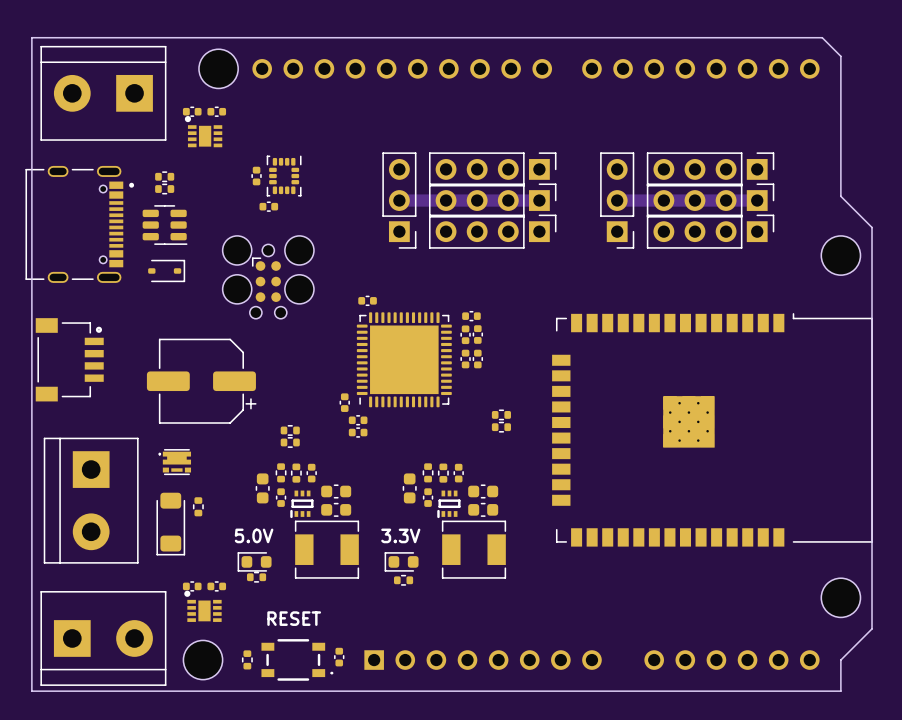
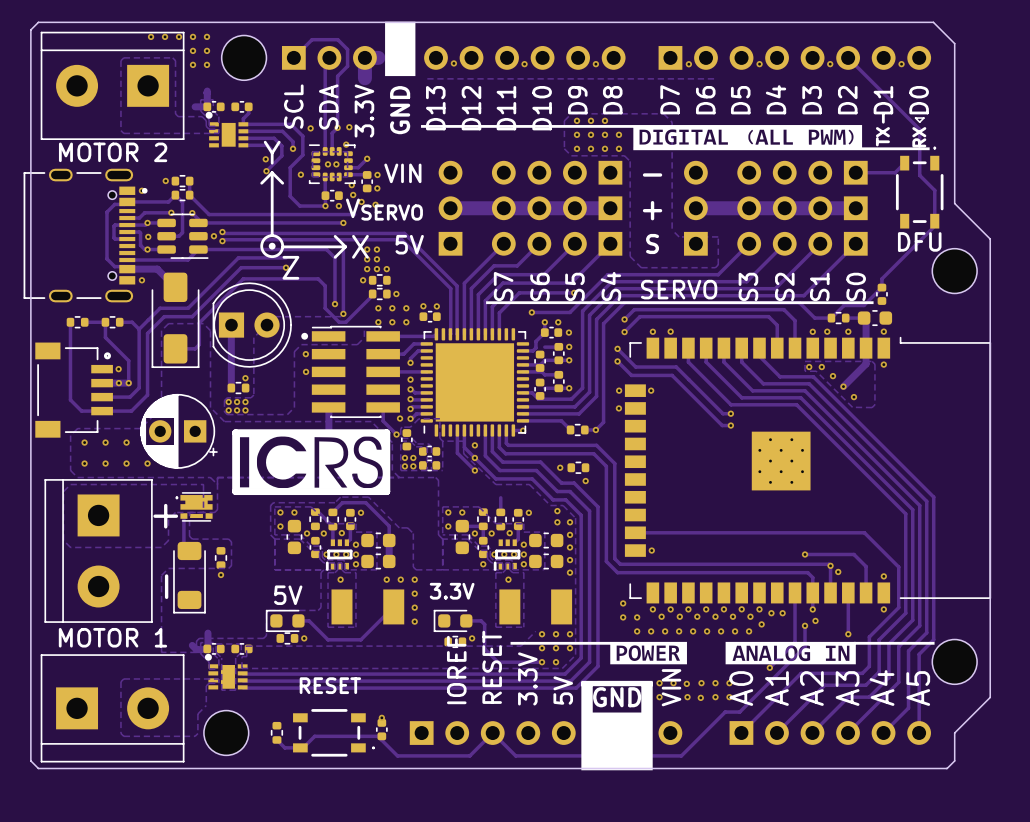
part footprint: [31, 37, 873, 692] -> [30, 21, 991, 770]
drawing: none -> [385, 21, 416, 77]
via: none -> (151, 36)
via: none -> (165, 36)
via: none -> (179, 36)
via: none -> (193, 36)
via: none -> (207, 36)
via: none -> (193, 50)
via: none -> (207, 50)
zone outline: none -> (123, 57) (120, 60) (120, 130) (123, 133) (218, 133) (218, 129) (209, 129) (206, 126) (206, 120) (202, 116) (178, 116) (175, 113) (175, 60) (172, 57) (123, 57)
track: none -> (293, 57) (312, 39) (337, 39) (347, 49) (347, 66) (337, 76) (337, 127) (332, 133) (332, 151)
track: none -> (329, 57) (325, 62) (325, 151)
track: none -> (378, 57) (364, 57) (364, 78)
part: none -> (453, 57)
part: none -> (794, 57)
track: none -> (848, 57) (919, 129) (919, 175) (934, 190) (934, 226) (881, 278) (881, 287)
via: none -> (453, 63)
via: none -> (193, 64)
via: none -> (207, 64)
via: none -> (524, 64)
via: none -> (595, 64)
via: none -> (688, 64)
via: none -> (759, 64)
via: none -> (830, 64)
via: none -> (901, 64)
zone outline: none -> (427, 78) (714, 78)
track: none -> (207, 91) (207, 106) (195, 106)
zone outline: none -> (200, 99) (200, 111) (209, 119) (209, 126) (218, 126) (218, 116) (213, 111) (213, 99) (200, 99)
text: none -> D9 (577, 100)
text: none -> D8 (612, 100)
text: none -> D7 (670, 99)
text: none -> D6 (705, 100)
text: none -> D5 (740, 100)
text: none -> D4 (776, 99)
text: none -> D3 (812, 100)
text: none -> D2 (847, 100)
text: none -> D1 (883, 100)
text: none -> D0 (919, 100)
track: none -> (248, 106) (248, 113) (243, 118) (243, 124) (290, 124) (302, 136) (302, 155) (290, 167) (290, 196) (299, 206) (325, 206) (325, 176)
text: none -> SCL (293, 106)
text: none -> SDA (328, 106)
text: none -> D13 (435, 108)
text: none -> D12 (471, 108)
text: none -> D11 (506, 108)
text: none -> D10 (542, 108)
text: none -> GND (400, 110)
text: none -> 3.3V (364, 110)
zone outline: none -> (571, 113) (663, 113) (672, 122) (672, 229) (679, 236) (718, 236) (718, 264) (715, 267) (641, 267) (630, 256) (630, 161) (624, 155) (571, 155) (564, 148) (564, 120) (571, 113)
line: none -> (883, 113) (883, 122)
line: none -> (915, 118) (923, 118) (919, 122) (915, 118)
via: none -> (577, 120)
via: none -> (590, 120)
via: none -> (604, 120)
drawing: none -> [421, 125, 930, 151]
via: none -> (349, 127)
via: none -> (310, 128)
via: none -> (337, 127)
track: none -> (243, 131) (282, 131) (293, 141) (293, 148)
via: none -> (577, 134)
via: none -> (590, 134)
via: none -> (604, 134)
via: none -> (618, 134)
text: none -> TX (882, 136)
text: none -> RX (919, 137)
track: none -> (243, 138) (274, 138) (281, 146) (281, 155) (266, 171)
via: none -> (346, 144)
track: none -> (243, 145) (267, 145) (272, 150)
via: none -> (293, 148)
via: none -> (577, 148)
via: none -> (590, 148)
via: none -> (604, 148)
via: none -> (618, 148)
text: none -> MOTOR 2 (113, 152)
text: none -> Y (272, 152)
zone outline: none -> (312, 151) (312, 176) (347, 176) (347, 151) (312, 151)
part footprint: [382, 152, 417, 249] -> [438, 160, 463, 256]
part footprint: [429, 152, 557, 187] -> [491, 160, 623, 185]
part footprint: [600, 152, 635, 249] -> [684, 160, 708, 256]
part footprint: [646, 152, 775, 187] -> [737, 160, 868, 185]
via: none -> (265, 159)
track: none -> (367, 158) (358, 167) (348, 167)
via: none -> (367, 158)
track: none -> (904, 163) (895, 172) (855, 172)
via: none -> (328, 164)
via: none -> (336, 164)
via: none -> (266, 171)
line: none -> (272, 172) (282, 183)
line: none -> (272, 172) (261, 183)
line: none -> (272, 172) (272, 235)
text: none -> VIN (402, 173)
via: none -> (300, 174)
track: none -> (348, 174) (367, 174)
via: none -> (377, 174)
text: none -> - (652, 175)
via: none -> (165, 180)
track: none -> (189, 181) (189, 195) (209, 214) (354, 214)
part: (256, 176) -> none
part rotation: 0° (284, 176) -> 90° counterclockwise (332, 164)
part: none -> (367, 181)
via: none -> (351, 185)
part: none -> (919, 187)
via: none -> (377, 188)
part footprint: [429, 183, 557, 218] -> [491, 196, 623, 221]
part footprint: [646, 183, 775, 218] -> [737, 196, 868, 221]
via: none -> (141, 190)
via: none -> (353, 194)
part: none -> (332, 195)
via: none -> (361, 201)
via: none -> (375, 204)
via: none -> (325, 206)
via: none -> (338, 206)
text: none -> VSERVO (384, 209)
text: none -> + (652, 210)
track: none -> (171, 212) (144, 212) (139, 218) (127, 218)
via: none -> (171, 212)
track: none -> (192, 213) (198, 219) (198, 222) (343, 222)
via: none -> (192, 213)
part: (268, 206) -> none
via: none -> (147, 222)
track: none -> (166, 222) (115, 225) (113, 237) (127, 239)
via: none -> (343, 222)
part footprint: [429, 214, 557, 249] -> [491, 231, 623, 256]
part footprint: [646, 214, 775, 249] -> [737, 231, 868, 256]
track: none -> (127, 232) (139, 232) (140, 245) (144, 249) (166, 249)
track: none -> (222, 232) (404, 233) (457, 285) (457, 334)
via: none -> (222, 232)
drawing: none -> [260, 234, 285, 259]
via: none -> (148, 236)
track: none -> (166, 236) (179, 236) (182, 232) (182, 202) (175, 195) (168, 201) (127, 201) (124, 204) (114, 204) (106, 212) (106, 258) (114, 266) (124, 266) (127, 269) (157, 269) (175, 287)
via: none -> (213, 236)
line: none -> (335, 236) (345, 246)
track: none -> (222, 241) (401, 239) (450, 288) (450, 334)
via: none -> (222, 241)
text: none -> DFU (919, 241)
track: none -> (503, 243) (464, 283) (464, 334)
track: none -> (539, 243) (517, 265) (494, 265) (471, 288) (471, 334)
track: none -> (574, 243) (543, 274) (498, 274) (478, 294) (478, 334)
track: none -> (610, 243) (571, 283) (503, 283) (485, 300) (485, 334)
text: none -> S (652, 244)
track: none -> (749, 243) (718, 274) (607, 274) (570, 312) (531, 312)
track: none -> (784, 243) (746, 281) (611, 281) (582, 311) (582, 388) (571, 399) (538, 399) (532, 392) (522, 392)
track: none -> (820, 243) (775, 288) (616, 288) (589, 315) (589, 392) (574, 406) (522, 406)
track: none -> (855, 243) (803, 295) (620, 295) (596, 319) (596, 396) (579, 413) (522, 413)
text: none -> 5V (409, 244)
line: none -> (282, 246) (345, 246)
line: none -> (345, 246) (335, 257)
text: none -> X (360, 246)
via: none -> (147, 249)
via: none -> (367, 249)
via: none -> (376, 249)
track: none -> (343, 250) (343, 313)
track: none -> (286, 257) (238, 257) (188, 308) (160, 308) (139, 329)
track: none -> (127, 260) (187, 260) (198, 249) (326, 249) (334, 257) (334, 304)
via: none -> (367, 259)
via: none -> (376, 259)
track: none -> (286, 267) (241, 267) (192, 316) (164, 316) (147, 333) (147, 395) (131, 411) (81, 411) (70, 399) (70, 322)
via: none -> (286, 267)
text: none -> Z (290, 267)
via: none -> (367, 269)
via: none -> (376, 269)
via: none -> (386, 269)
via: none -> (141, 280)
via: none -> (363, 280)
part: none -> (379, 280)
text: none -> S7 (503, 286)
text: none -> S6 (540, 286)
text: none -> S5 (574, 286)
text: none -> S4 (610, 286)
text: none -> S3 (748, 286)
text: none -> S2 (784, 286)
text: none -> S1 (819, 286)
text: none -> S0 (856, 286)
track: none -> (881, 287) (863, 305) (844, 305) (831, 318) (814, 318) (799, 302) (624, 302) (603, 323) (603, 422) (595, 429) (584, 429)
part: (166, 270) -> none
text: none -> SERVO (679, 289)
track: none -> (574, 292) (519, 292) (499, 312) (499, 334)
via: none -> (574, 292)
track: none -> (372, 294) (345, 322) (339, 322) (325, 308) (325, 285) (318, 278) (243, 278) (199, 322) (199, 344) (195, 348) (175, 348)
part: none -> (379, 294)
via: none -> (396, 294)
part: none -> (881, 294)
part: (268, 277) -> none
drawing: none -> [486, 301, 874, 305]
via: none -> (334, 304)
track: none -> (495, 303) (492, 306) (492, 334)
via: none -> (423, 306)
via: none -> (436, 306)
via: none -> (378, 308)
via: none -> (392, 308)
via: none -> (406, 308)
via: none -> (531, 312)
via: none -> (343, 313)
zone outline: none -> (343, 316) (274, 316) (253, 337) (253, 395) (251, 397) (227, 397) (224, 400) (224, 411) (227, 414) (287, 414) (294, 407) (294, 351) (301, 344) (357, 344) (364, 337) (364, 330)
part: none -> (838, 318)
track: none -> (845, 318) (864, 318) (866, 320) (866, 364) (843, 386)
part: none -> (874, 318)
track: none -> (624, 319) (634, 309) (784, 309) (795, 320) (795, 348)
via: none -> (624, 319)
part: none -> (175, 320)
part: none -> (77, 322)
track: none -> (84, 322) (105, 322) (105, 337) (128, 360) (128, 383) (102, 383)
part: none -> (112, 322)
track: none -> (119, 322) (132, 322) (139, 329)
via: none -> (378, 322)
via: none -> (392, 322)
via: none -> (406, 322)
part position: (367, 300) -> (430, 316)
track: none -> (544, 322) (544, 332) (535, 341) (535, 347) (532, 350) (522, 350)
via: none -> (544, 322)
via: none -> (558, 322)
track: none -> (231, 325) (231, 387)
part: none -> (252, 325)
track: none -> (139, 329) (139, 388) (130, 397) (102, 397)
track: none -> (624, 332) (639, 316) (768, 316) (777, 325) (777, 348)
via: none -> (624, 332)
via: none -> (652, 331)
via: none -> (670, 331)
via: none -> (812, 331)
via: none -> (827, 331)
via: none -> (848, 331)
via: none -> (883, 331)
drawing: none -> [301, 332, 309, 340]
part: none -> (551, 332)
via: none -> (568, 332)
track: none -> (436, 334) (434, 336) (383, 336)
part: (471, 316) -> none
track: none -> (426, 343) (413, 343) (403, 354) (383, 354)
track: none -> (558, 346) (544, 347)
via: none -> (569, 346)
track: none -> (617, 348) (635, 367) (676, 367) (723, 413) (730, 413)
via: none -> (617, 348)
track: none -> (688, 348) (688, 362) (731, 404) (796, 404) (905, 513) (905, 613) (879, 639) (879, 671) (865, 685) (824, 685) (777, 732)
track: none -> (706, 348) (706, 362) (741, 397) (800, 397) (912, 509) (912, 620) (888, 644) (888, 677) (869, 697) (848, 697) (812, 732)
track: none -> (723, 348) (723, 362) (752, 390) (805, 390) (919, 505) (919, 625) (898, 646) (898, 682) (848, 732)
track: none -> (741, 348) (741, 362) (763, 383) (809, 383) (926, 501) (926, 632) (908, 651) (908, 708) (883, 732)
track: none -> (759, 348) (759, 356) (780, 376) (813, 376) (933, 497) (933, 639) (919, 654) (919, 732)
track: none -> (426, 350) (418, 350) (410, 358) (410, 362)
part: none -> (558, 353)
via: none -> (305, 354)
track: none -> (569, 360) (545, 360) (540, 364) (522, 364)
via: none -> (569, 360)
part: (465, 334) -> none
track: none -> (617, 361) (631, 375) (672, 375) (722, 425) (730, 425)
via: none -> (617, 361)
zone outline: none -> (805, 361) (805, 371) (816, 371) (852, 407) (872, 407) (874, 404) (874, 364) (872, 361) (805, 361)
via: none -> (410, 362)
via: none -> (883, 364)
via: none -> (809, 367)
via: none -> (821, 367)
via: none -> (118, 369)
via: none -> (306, 371)
part: none -> (355, 371)
track: none -> (383, 371) (426, 371)
track: none -> (522, 371) (541, 371) (544, 374) (558, 374)
via: none -> (832, 376)
via: none -> (245, 378)
via: none -> (410, 379)
part: none -> (558, 381)
via: none -> (118, 383)
via: none -> (128, 383)
via: none -> (843, 386)
part: none -> (238, 388)
track: none -> (544, 388) (569, 388)
via: none -> (569, 388)
track: none -> (410, 389) (415, 392) (426, 392)
via: none -> (410, 389)
part position: (404, 359) -> (474, 382)
part: (465, 359) -> none
via: none -> (619, 390)
via: none -> (651, 390)
via: none -> (853, 397)
track: none -> (410, 399) (426, 399)
via: none -> (410, 399)
via: none -> (228, 402)
via: none -> (237, 402)
via: none -> (245, 402)
track: none -> (328, 407) (328, 430)
track: none -> (383, 407) (383, 421) (396, 434)
track: none -> (426, 406) (412, 406) (410, 408)
via: none -> (618, 408)
via: none -> (410, 408)
via: none -> (228, 410)
via: none -> (237, 410)
via: none -> (245, 410)
track: none -> (426, 413) (416, 413) (410, 418)
via: none -> (730, 413)
part: (201, 381) -> none
via: none -> (400, 418)
via: none -> (410, 418)
track: none -> (522, 420) (561, 420) (570, 429)
via: none -> (730, 425)
part: none -> (577, 429)
via: none -> (595, 429)
part: none -> (178, 431)
track: none -> (457, 430) (457, 453) (474, 470)
track: none -> (464, 430) (464, 447) (495, 478) (532, 478) (553, 499) (565, 499) (581, 515) (581, 657) (565, 674) (243, 674)
track: none -> (485, 430) (485, 455) (500, 470) (536, 470) (557, 491) (570, 491) (589, 511) (589, 662) (570, 681) (243, 681)
track: none -> (492, 430) (492, 451) (502, 462) (540, 462) (561, 483) (574, 483) (597, 506) (597, 666) (576, 688) (243, 688)
track: none -> (499, 430) (499, 447) (505, 453) (593, 453) (606, 466) (606, 561) (617, 572) (807, 572) (812, 577) (812, 609)
track: none -> (506, 430) (506, 443) (508, 445) (596, 445) (614, 463) (614, 558) (620, 564) (828, 564) (830, 592)
track: none -> (513, 430) (522, 430)
via: none -> (523, 430)
drawing: none -> [235, 432, 388, 489]
line: none -> (235, 432) (386, 432) (386, 491) (235, 491) (235, 432)
via: none -> (396, 434)
part: (344, 402) -> none
part: none -> (406, 439)
zone outline: none -> (400, 441) (400, 470) (427, 470) (427, 446) (416, 446) (410, 441) (400, 441)
zone outline: none -> (442, 441) (442, 470) (431, 470) (431, 446) (428, 443) (417, 443) (411, 438) (402, 438) (400, 428) (410, 427) (418, 418) (439, 418) (439, 438) (442, 441)
zone outline: none -> (442, 441) (463, 441) (463, 453) (495, 484) (529, 484) (550, 505) (563, 505) (575, 518) (575, 655) (562, 668) (241, 668) (241, 656) (246, 656) (246, 646) (521, 646) (535, 631)
via: none -> (84, 442)
via: none -> (105, 442)
via: none -> (126, 442)
via: none -> (474, 445)
part: none -> (429, 451)
part: (501, 414) -> none
via: none -> (404, 457)
via: none -> (413, 457)
via: none -> (474, 457)
part: (358, 420) -> none
via: none -> (84, 463)
via: none -> (105, 463)
via: none -> (126, 463)
via: none -> (147, 463)
part: none -> (429, 465)
via: none -> (404, 466)
via: none -> (413, 466)
via: none -> (560, 467)
part: (501, 427) -> none
part: none -> (578, 467)
part: (290, 430) -> none
via: none -> (474, 470)
part: (358, 432) -> none
zone outline: none -> (399, 477) (392, 470) (392, 442) (371, 421) (224, 421) (210, 407) (210, 330) (203, 323) (168, 323) (161, 330) (161, 407) (140, 428) (77, 428) (70, 435) (70, 470) (77, 477) (210, 477) (217, 484)
via: none -> (585, 481)
part: (290, 442) -> none
track: none -> (500, 497) (500, 512)
zone outline: none -> (274, 506) (274, 534) (300, 534) (311, 546) (319, 546) (322, 548) (322, 557) (325, 560) (343, 560) (344, 569) (376, 569) (376, 532) (355, 532) (355, 523) (328, 523) (311, 506) (274, 506)
zone outline: none -> (442, 506) (442, 534) (467, 534) (479, 546) (487, 546) (490, 548) (490, 557) (493, 560) (511, 560) (512, 569) (544, 568) (544, 532) (523, 532) (523, 523) (495, 523) (479, 506) (442, 506)
via: none -> (557, 511)
zone outline: none -> (189, 512) (189, 536) (192, 539) (228, 539) (231, 541) (231, 565) (228, 568) (168, 568) (161, 575) (161, 652) (196, 652) (196, 641) (199, 638) (263, 638) (266, 635) (266, 613) (269, 610) (318, 610) (321, 607) (321, 572) (323, 569)
zone outline: none -> (203, 512) (203, 484) (70, 484) (63, 491) (63, 540) (70, 547) (161, 547) (168, 540) (168, 519) (175, 512) (214, 512) (217, 509) (217, 477) (435, 477) (438, 480) (438, 534) (442, 539)
via: none -> (280, 512)
via: none -> (294, 512)
track: none -> (315, 512) (318, 512) (332, 526) (332, 542)
track: none -> (332, 512) (342, 502) (365, 502) (389, 526) (389, 561)
via: none -> (448, 512)
via: none -> (462, 512)
via: none -> (360, 512)
via: none -> (528, 512)
text: none -> + (165, 516)
track: none -> (183, 516) (183, 545) (189, 550)
via: none -> (557, 522)
via: none -> (570, 522)
track: none -> (350, 526) (350, 539) (346, 542)
track: none -> (462, 526) (483, 526) (483, 540)
track: none -> (518, 526) (518, 539) (514, 542)
via: none -> (280, 526)
via: none -> (448, 526)
track: none -> (635, 532) (864, 532) (898, 567) (898, 607) (869, 637) (869, 666) (862, 673) (801, 673) (741, 732)
via: none -> (307, 533)
via: none -> (323, 533)
via: none -> (341, 533)
via: none -> (474, 533)
via: none -> (491, 533)
via: none -> (509, 533)
via: none -> (570, 534)
zone outline: none -> (274, 539) (270, 534) (270, 505) (273, 502) (334, 502) (340, 497) (368, 497) (399, 527) (407, 527) (413, 533) (413, 567) (416, 569) (502, 569) (502, 562) (491, 562) (487, 558) (487, 550) (479, 550) (467, 539) (442, 539)
zone outline: none -> (274, 539) (274, 569) (334, 569) (334, 562) (323, 562) (319, 558) (319, 550) (311, 550) (300, 539) (274, 539)
zone outline: none -> (442, 539) (442, 569)
via: none -> (355, 544)
via: none -> (523, 544)
via: none -> (570, 547)
via: none -> (651, 550)
via: none -> (326, 554)
via: none -> (336, 554)
via: none -> (346, 554)
via: none -> (355, 554)
via: none -> (494, 554)
via: none -> (504, 554)
via: none -> (514, 554)
via: none -> (523, 554)
track: none -> (805, 554) (853, 554) (866, 566) (866, 592)
via: none -> (805, 554)
via: none -> (570, 560)
zone outline: none -> (337, 562) (337, 569) (334, 572) (328, 572) (328, 627) (355, 627) (355, 572) (344, 572) (341, 569) (341, 562) (337, 562)
zone outline: none -> (505, 562) (509, 562) (509, 569) (512, 572) (523, 572) (523, 627) (495, 627) (495, 572) (502, 572) (505, 569) (505, 562)
via: none -> (355, 564)
via: none -> (483, 564)
via: none -> (523, 564)
via: none -> (830, 565)
via: none -> (570, 572)
via: none -> (838, 571)
part footprint: [294, 520, 360, 579] -> [331, 589, 405, 625]
part footprint: [441, 520, 507, 579] -> [499, 589, 573, 625]
via: none -> (220, 574)
via: none -> (883, 576)
via: none -> (340, 579)
via: none -> (386, 579)
via: none -> (400, 579)
via: none -> (414, 579)
via: none -> (508, 579)
text: none -> - (166, 586)
text: 5.0V (254, 535) -> 5V (288, 595)
track: none -> (795, 592) (795, 642) (769, 667)
track: none -> (848, 592) (848, 634)
via: none -> (414, 593)
via: none -> (623, 603)
track: none -> (393, 606) (360, 639) (328, 639) (309, 620) (298, 620)
via: none -> (414, 607)
via: none -> (652, 609)
via: none -> (670, 609)
via: none -> (688, 609)
via: none -> (706, 609)
via: none -> (723, 609)
via: none -> (741, 609)
via: none -> (759, 609)
via: none -> (812, 609)
via: none -> (883, 609)
via: none -> (771, 613)
via: none -> (782, 613)
via: none -> (623, 617)
via: none -> (637, 617)
via: none -> (661, 616)
via: none -> (679, 616)
via: none -> (697, 616)
via: none -> (715, 616)
via: none -> (732, 616)
via: none -> (750, 616)
track: none -> (466, 620) (481, 620) (484, 624) (484, 648) (497, 662) (542, 662)
via: none -> (815, 620)
via: none -> (414, 621)
via: none -> (761, 624)
track: none -> (805, 625) (805, 646) (739, 712) (725, 712) (681, 755) (515, 755) (492, 732) (469, 755) (397, 755) (377, 736) (314, 736) (303, 747) (284, 747) (276, 739)
via: none -> (805, 625)
via: none -> (637, 631)
via: none -> (651, 631)
via: none -> (665, 631)
via: none -> (679, 631)
via: none -> (693, 631)
via: none -> (707, 631)
via: none -> (721, 631)
via: none -> (735, 631)
via: none -> (749, 631)
track: none -> (207, 633) (207, 649) (196, 649) (192, 645)
via: none -> (542, 634)
via: none -> (556, 634)
via: none -> (570, 634)
via: none -> (848, 634)
text: none -> MOTOR 1 (112, 637)
via: none -> (304, 638)
via: none -> (472, 638)
zone outline: none -> (200, 642) (213, 642) (213, 653) (218, 659) (218, 669) (209, 669) (209, 662) (200, 653) (200, 642)
drawing: none -> [510, 641, 935, 771]
zone outline: none -> (216, 644) (216, 652) (221, 657) (221, 690) (235, 690) (235, 657) (241, 652) (241, 644) (216, 644)
via: none -> (542, 648)
via: none -> (556, 648)
via: none -> (570, 648)
via: none -> (542, 662)
via: none -> (556, 662)
text: none -> RESET (492, 667)
via: none -> (769, 667)
text: none -> IOREF (456, 670)
zone outline: none -> (123, 678) (218, 678) (218, 683) (209, 683) (206, 685) (206, 705) (197, 713) (197, 733) (195, 736) (123, 736) (120, 733) (120, 681) (123, 678)
text: none -> 3.3V (527, 678)
via: none -> (659, 683)
via: none -> (673, 683)
via: none -> (701, 683)
via: none -> (715, 683)
via: none -> (729, 683)
via: none -> (686, 683)
text: none -> VIN (671, 687)
text: none -> A4 (882, 688)
text: none -> A0 (741, 688)
text: none -> A1 (776, 688)
text: none -> A2 (811, 688)
text: none -> A3 (847, 688)
text: none -> A5 (918, 688)
text: none -> 5V (563, 690)
text: none -> GND (617, 697)
via: none -> (659, 697)
via: none -> (687, 697)
via: none -> (715, 697)
via: none -> (729, 697)
via: none -> (700, 697)
via: none -> (381, 717)
part: none -> (546, 733)
part: none -> (830, 732)

